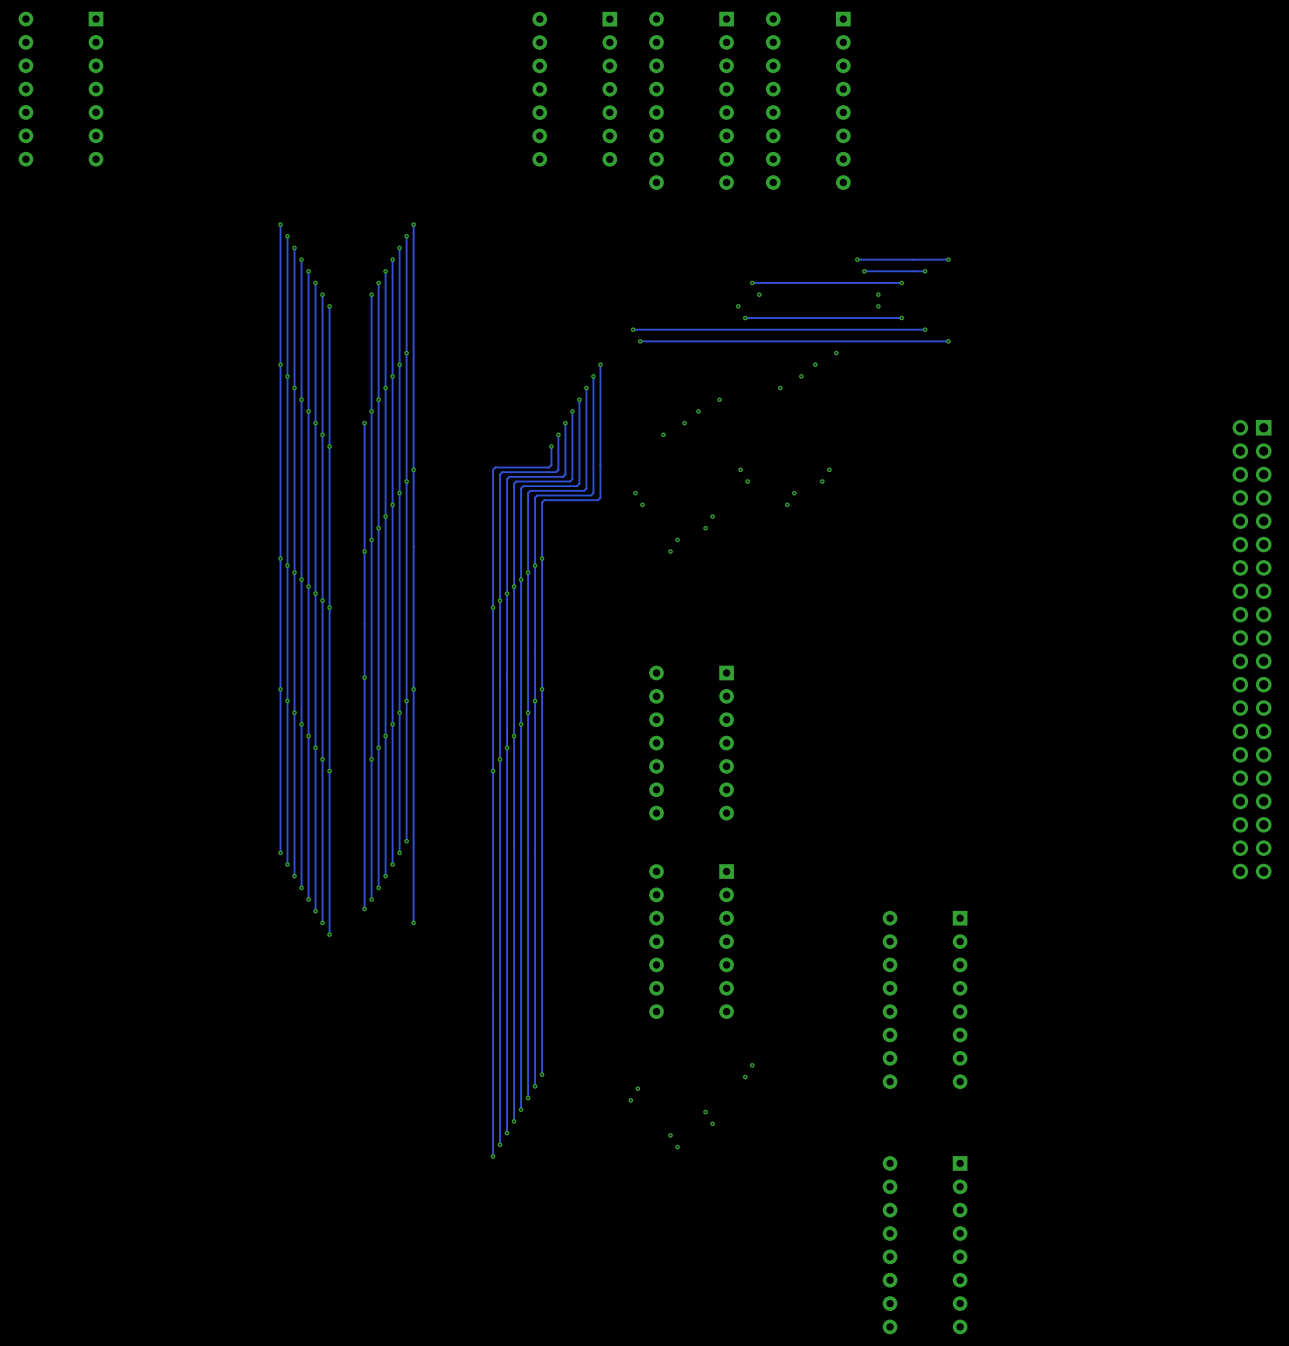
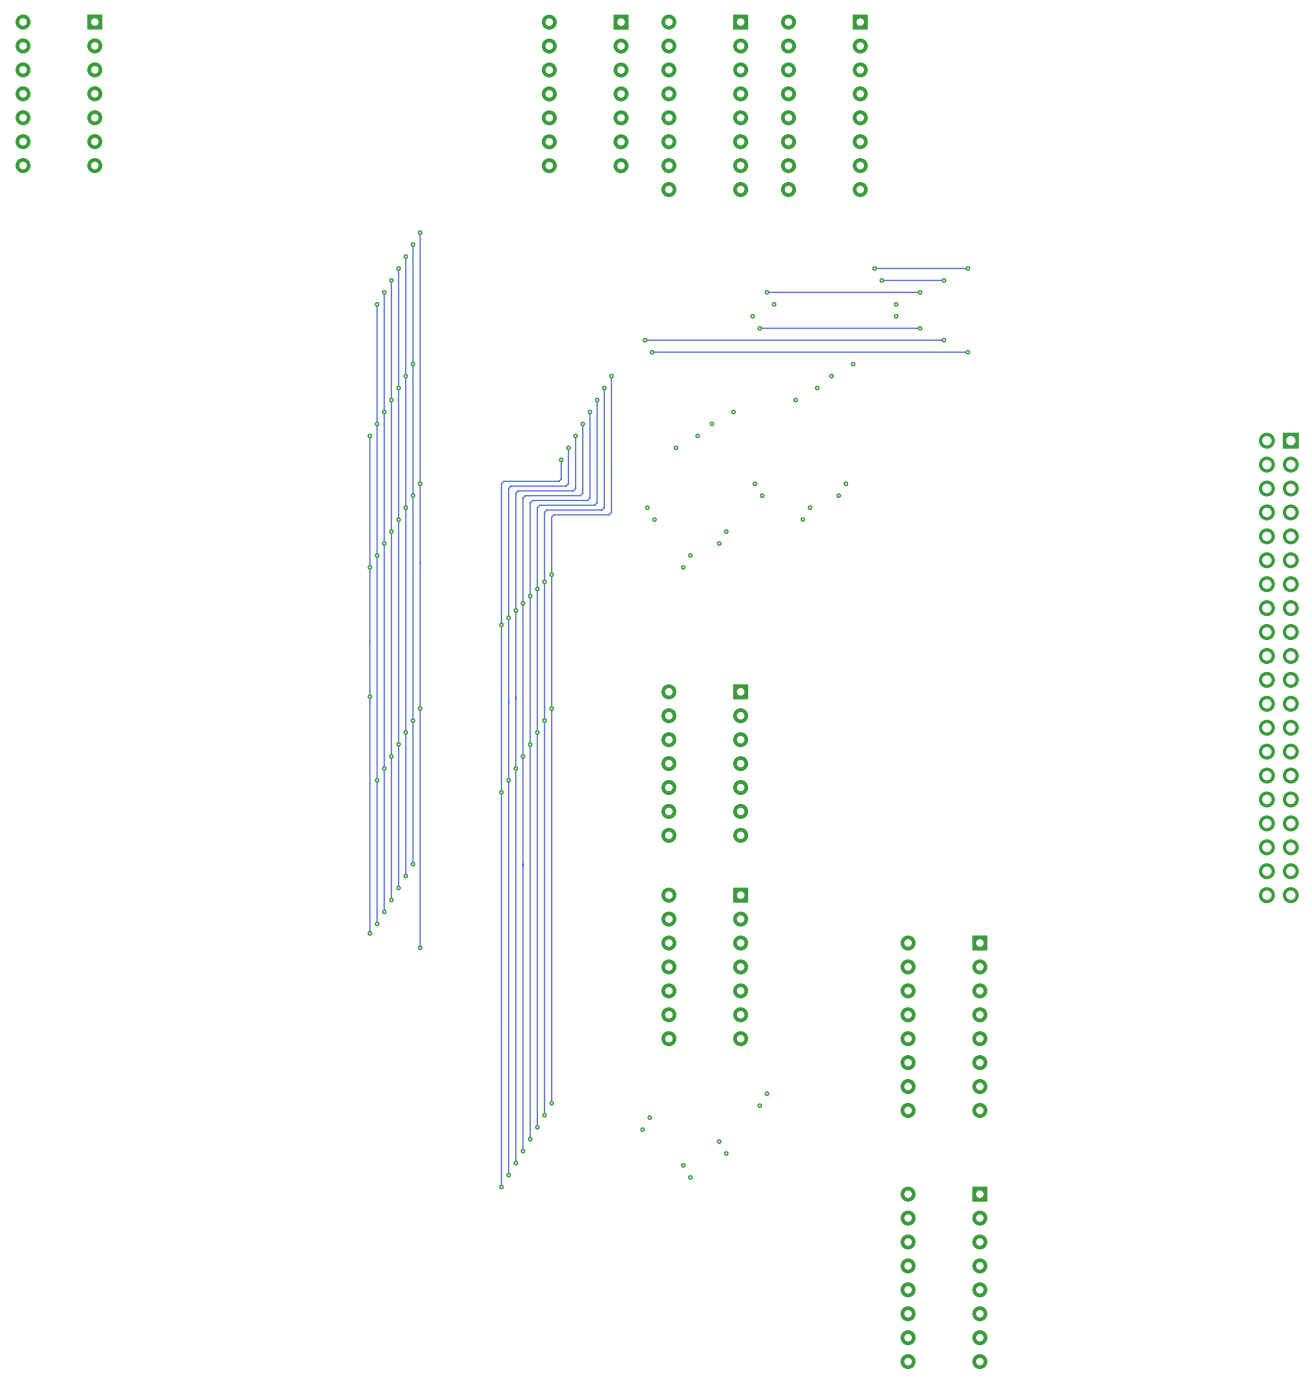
track: (280, 224) (280, 852) -> none
via: (280, 224) -> none
track: (287, 236) (287, 864) -> none
via: (287, 236) -> none
track: (294, 247) (294, 876) -> none
via: (294, 247) -> none
track: (301, 259) (301, 887) -> none
via: (301, 259) -> none
track: (308, 271) (308, 899) -> none
via: (308, 271) -> none
track: (315, 282) (315, 911) -> none
via: (315, 282) -> none
track: (322, 294) (322, 922) -> none
via: (322, 294) -> none
track: (329, 306) (329, 934) -> none
via: (329, 306) -> none
via: (280, 364) -> none
via: (287, 376) -> none
via: (294, 388) -> none
via: (301, 399) -> none
via: (308, 411) -> none
via: (315, 423) -> none
via: (322, 434) -> none
via: (329, 446) -> none
via: (280, 558) -> none
via: (287, 565) -> none
via: (294, 572) -> none
via: (301, 579) -> none
via: (308, 586) -> none
via: (315, 593) -> none
via: (322, 600) -> none
via: (329, 607) -> none
via: (280, 689) -> none
via: (287, 701) -> none
via: (294, 712) -> none
via: (301, 724) -> none
via: (308, 736) -> none
via: (315, 747) -> none
via: (322, 759) -> none
via: (329, 771) -> none
via: (280, 852) -> none
via: (287, 864) -> none
via: (294, 876) -> none
via: (301, 887) -> none
via: (308, 899) -> none
via: (315, 911) -> none
via: (322, 922) -> none
via: (329, 934) -> none

